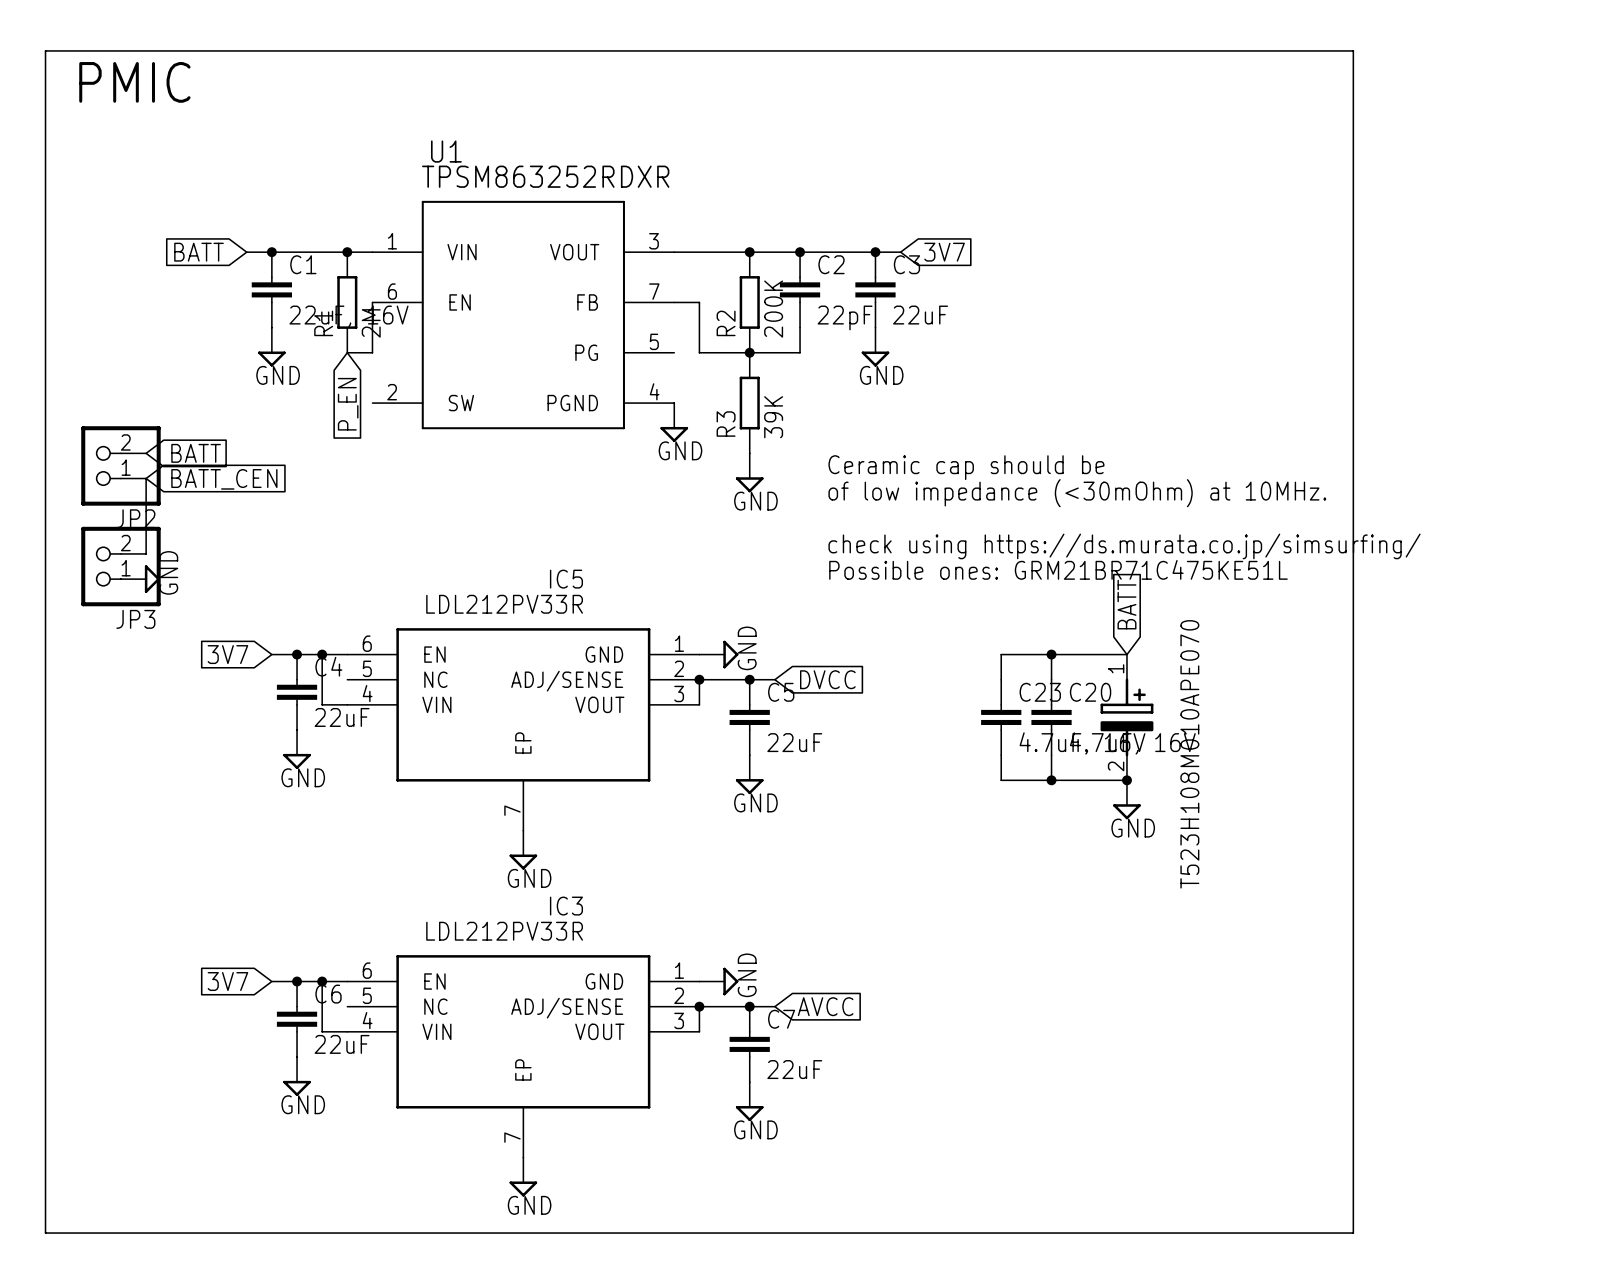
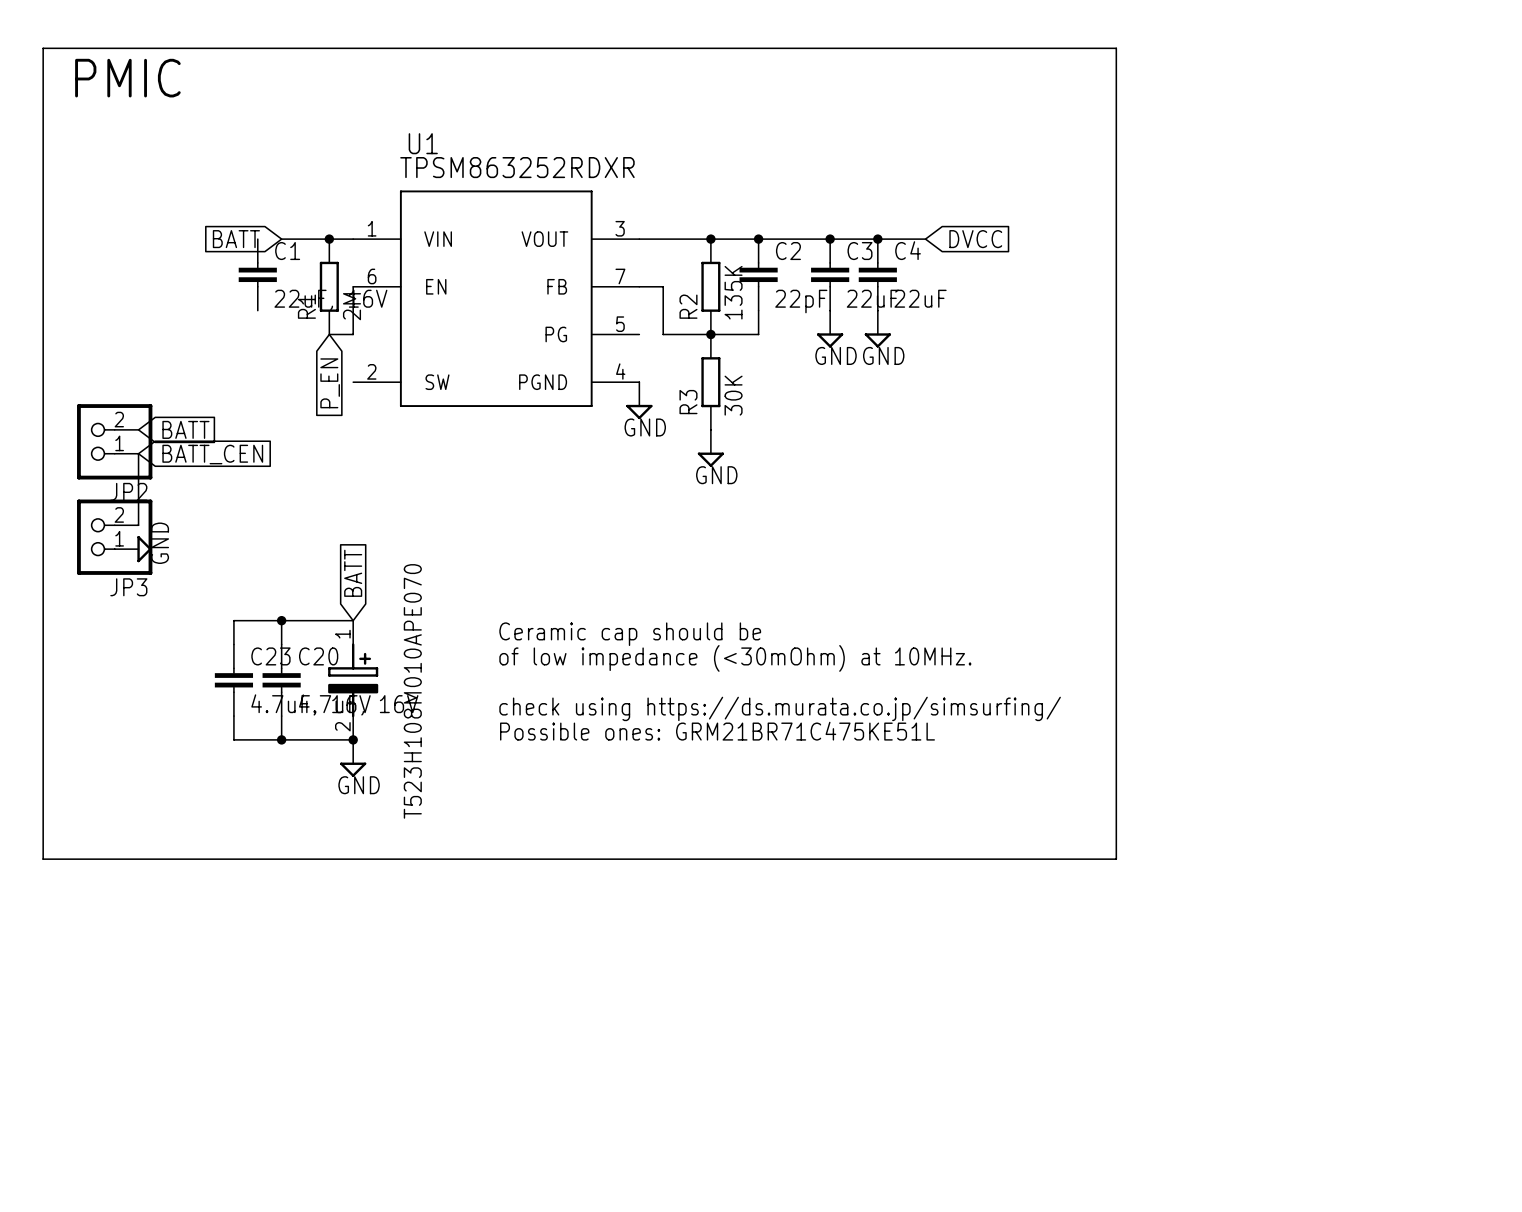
line: (1177, 50) (1353, 50) (1353, 1233) (45, 1233) (45, 906) -> (1116, 48) (1116, 859) (43, 859)
global label position: BATT (199, 252) -> BATT (236, 239)
wire: (246, 252) (297, 252) -> none
junction: (271, 252) -> none
wire: none -> (853, 239) (925, 239)
junction: none -> (877, 239)
global label: 3V7 (944, 252) -> none
global label: none -> DVCC (975, 239)
R2 value: 200K (773, 309) -> 135K (733, 292)
power symbol: GND (271, 347) -> none
power symbol: none -> GND (877, 329)
R3 value: 39K (773, 417) -> 30K (733, 395)
text: Ceramic cap should be (966, 467) -> none
text: of low impedance (<30mOhm) at 10MHz. (1077, 493) -> none
text: check using https://ds.murata.co.jp/simsurfing/ (1124, 546) -> none
text: Possible ones: GRM21BR71C475KE51L (1058, 569) -> none
global label: none -> BATT (353, 573)
global label: BATT (1126, 604) -> none
global label: 3V7 (227, 654) -> none
wire: none -> (257, 620) (233, 620) (233, 644)
wire: (322, 654) (322, 704) (347, 704) -> none
junction: (322, 654) -> none
power symbol: GND (718, 654) -> none
wire: (1051, 654) (1051, 679) -> none
junction: (1051, 654) -> none
wire: (1126, 654) (1001, 654) (1001, 679) -> none
text: none -> Ceramic cap should be (630, 634)
junction: (699, 679) -> none
junction: (749, 679) -> none
wire: (774, 679) (699, 679) (699, 704) -> none
global label: DVCC (827, 679) -> none
C4 position: (297, 692) -> (877, 274)
text: none -> of low impedance (<30mOhm) at 10MHz. (735, 658)
part: none -> T523H108M010APE070 (353, 680)
C5: 22uF (749, 717) -> none
C23 position: (1001, 717) -> (233, 680)
C20 position: (1051, 717) -> (281, 680)
part: T523H108M010APE070 (1126, 717) -> none
IC5: LDL212PV33R (523, 729) -> none
text: none -> check using https://ds.murata.co.jp/simsurfing/ (780, 708)
power symbol: GND (297, 749) -> none
wire: none -> (233, 716) (233, 739) (353, 739)
wire: none -> (281, 716) (281, 739)
wire: (1001, 755) (1001, 780) (1126, 780) -> none
wire: (1051, 755) (1051, 780) -> none
text: none -> Possible ones: GRM21BR71C475KE51L (717, 731)
power symbol: GND (749, 774) -> none
junction: none -> (281, 739)
junction: none -> (353, 739)
junction: (1051, 780) -> none
junction: (1126, 780) -> none
power symbol: none -> GND (353, 758)
power symbol: GND (1126, 799) -> none
power symbol: GND (523, 850) -> none
global label: 3V7 (227, 981) -> none
wire: (271, 981) (347, 981) -> none
junction: (297, 981) -> none
wire: (322, 981) (322, 1031) (347, 1031) -> none
junction: (322, 981) -> none
power symbol: GND (718, 981) -> none
junction: (699, 1006) -> none
junction: (749, 1006) -> none
wire: (774, 1006) (699, 1006) (699, 1031) -> none
global label: AVCC (825, 1006) -> none
C6: 22uF (297, 1019) -> none
C7: 22uF (749, 1044) -> none
IC3: LDL212PV33R (523, 1056) -> none
power symbol: GND (297, 1076) -> none
power symbol: GND (749, 1101) -> none
power symbol: GND (523, 1177) -> none

